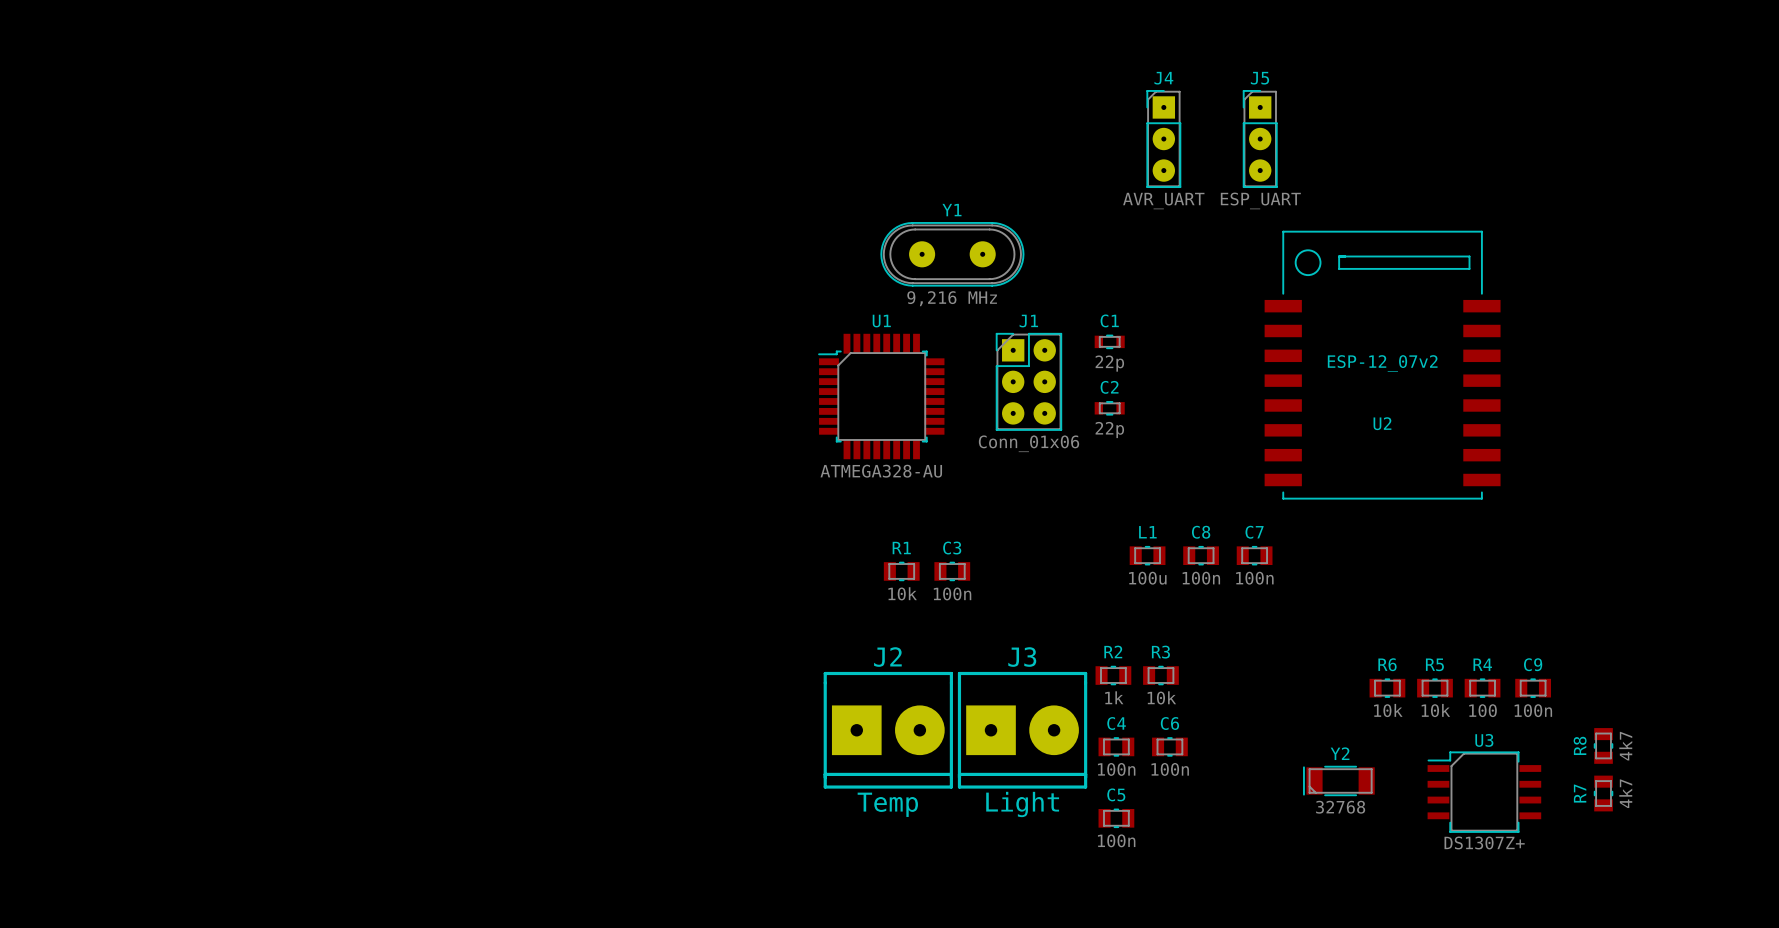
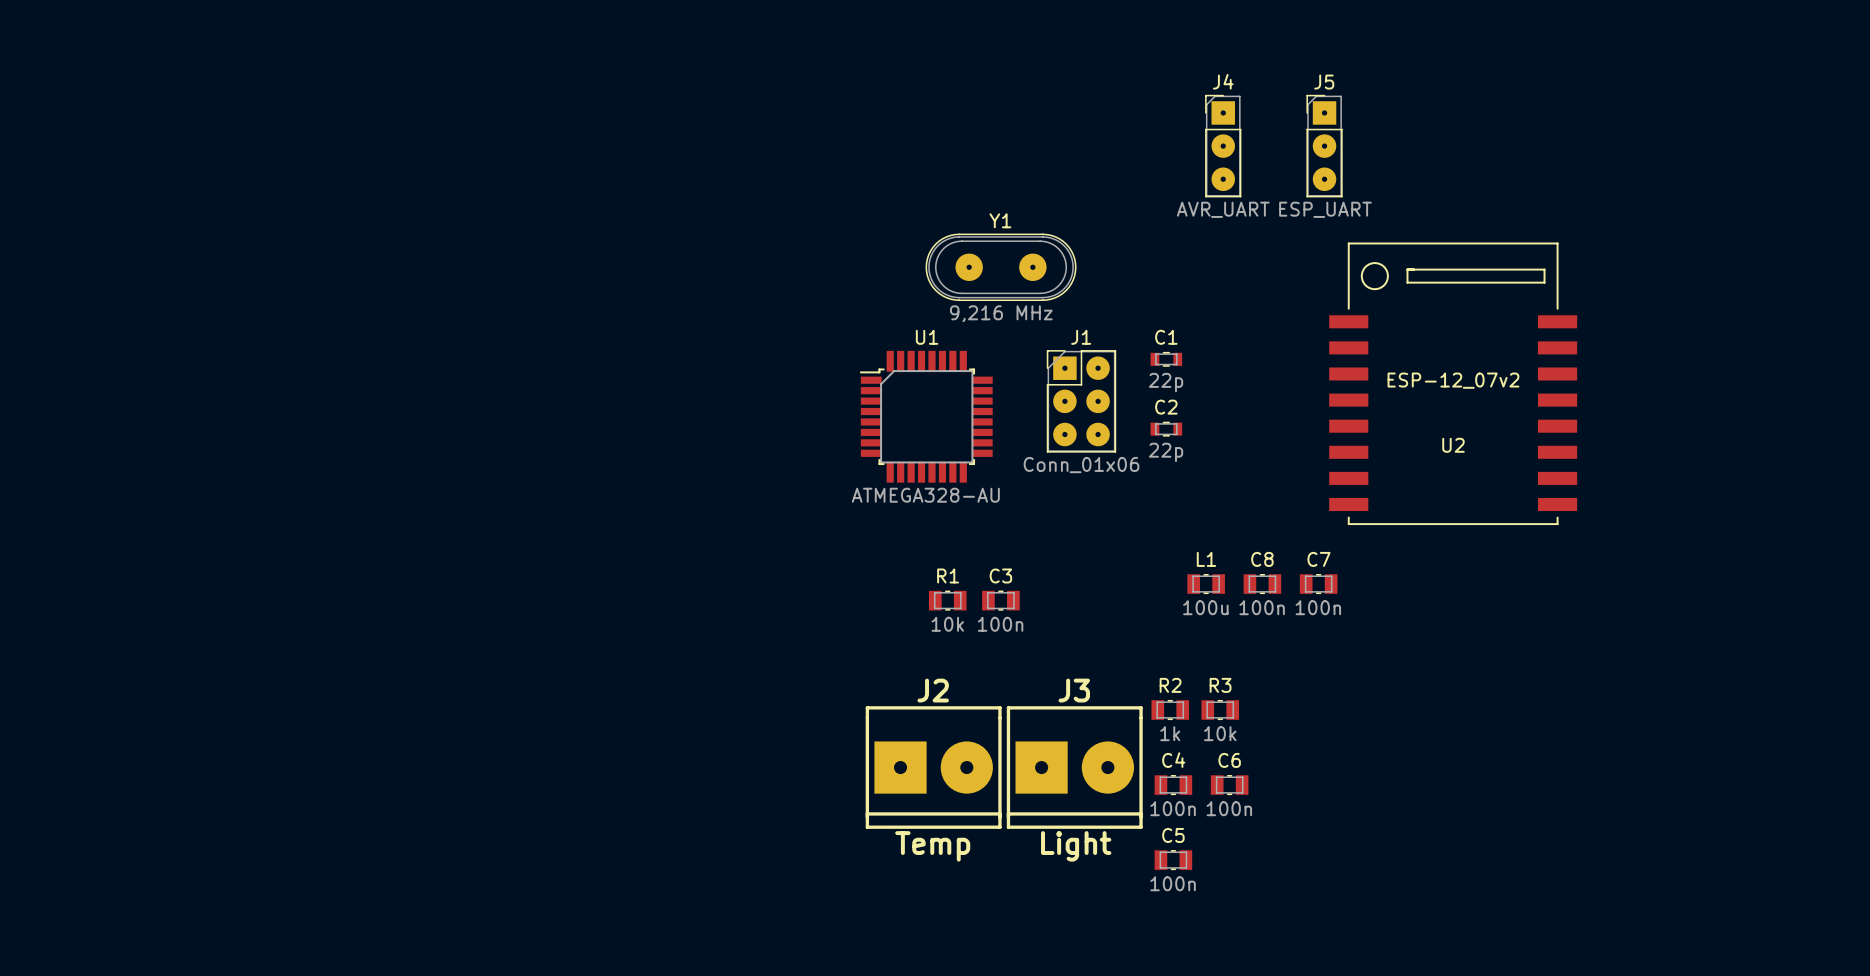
R6: 10k (1387, 688) -> none
R5: 10k (1434, 688) -> none
R4: 100 (1482, 688) -> none
C9: 100n (1533, 688) -> none
R8: 4k7 (1603, 745) -> none
Y2: 32768 (1338, 780) -> none
U3: DS1307Z+ (1484, 792) -> none
R7: 4k7 (1603, 793) -> none

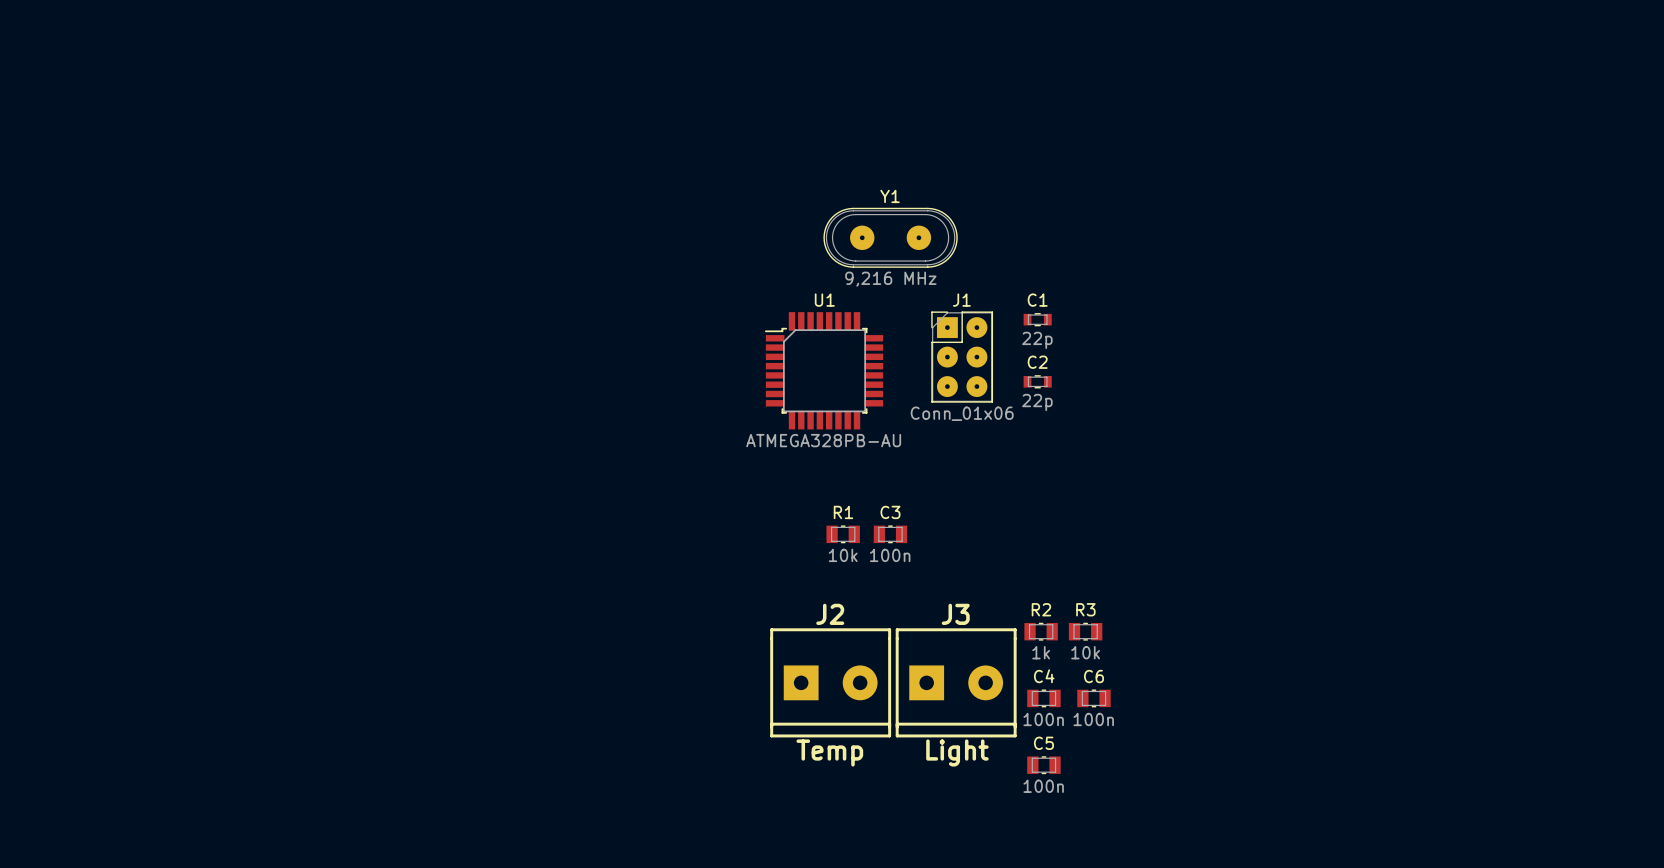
J4: AVR_UART (1223, 146) -> none
J5: ESP_UART (1324, 146) -> none
U2: ESP-12_07v2 (1453, 383) -> none
U1 value: ATMEGA328-AU (925, 495) -> ATMEGA328PB-AU (823, 440)
L1: 100u (1206, 584) -> none
C8: 100n (1262, 584) -> none
C7: 100n (1318, 584) -> none
J2 footprint: [865, 706, 1002, 829] -> [770, 628, 892, 738]
J3 footprint: [1006, 706, 1143, 829] -> [895, 628, 1017, 738]

